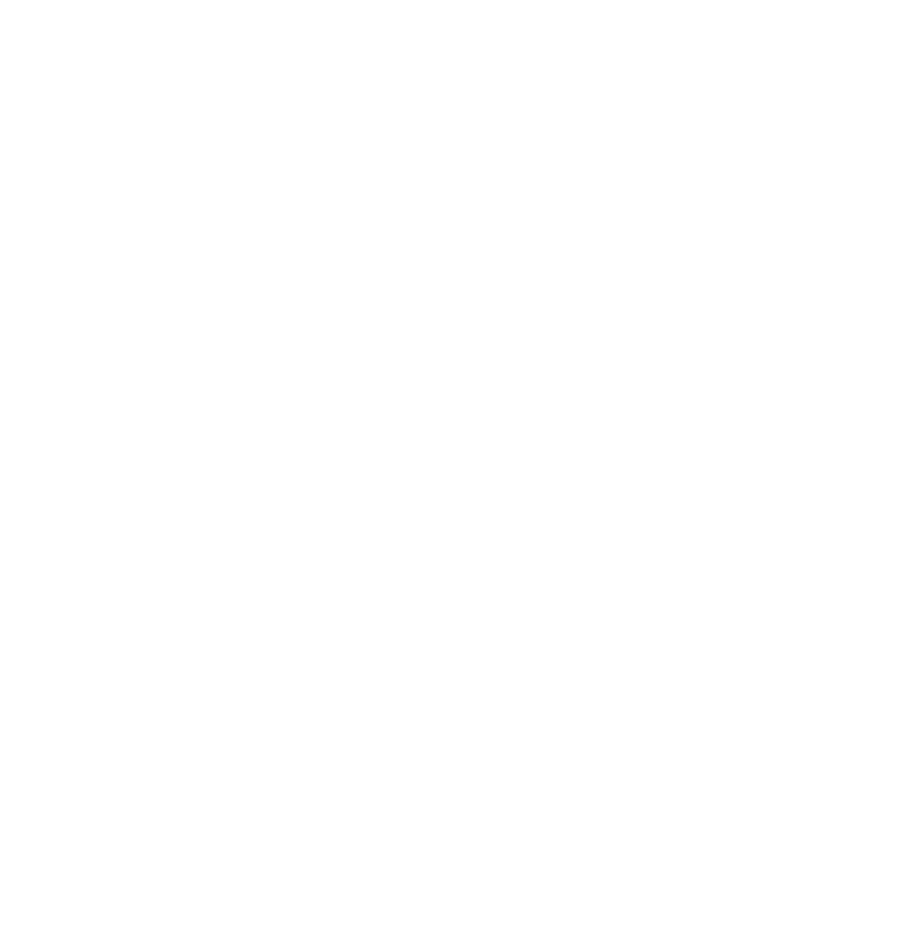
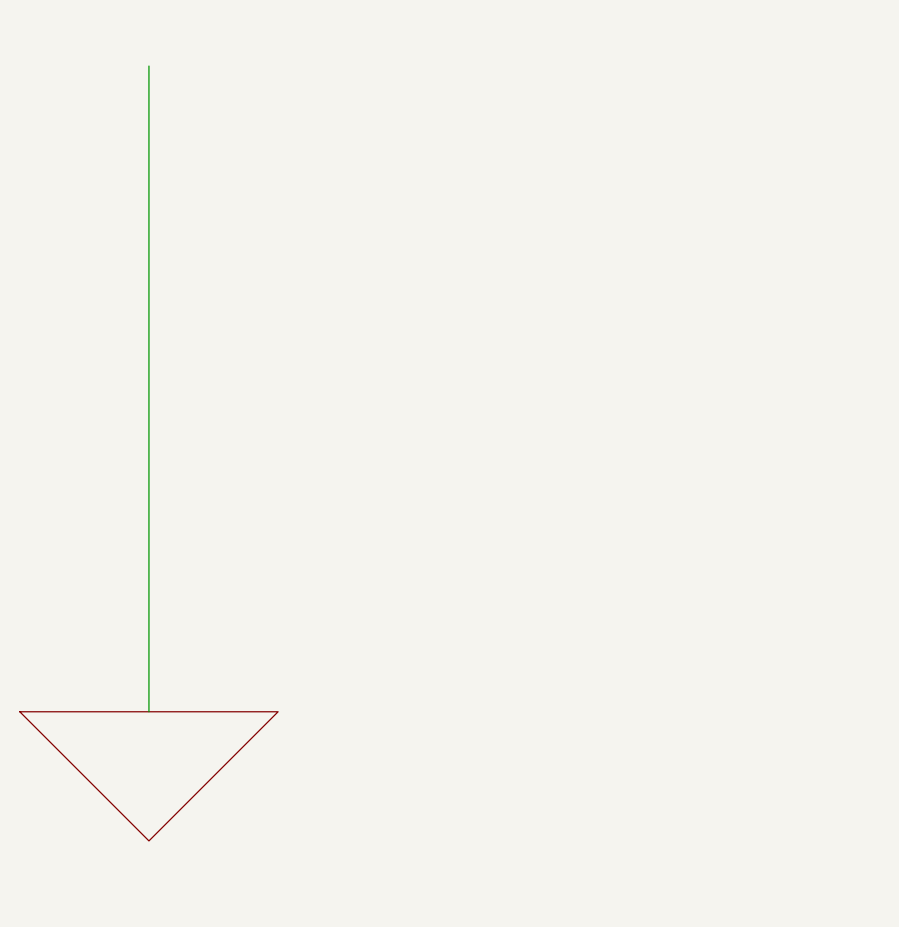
wire: none -> (148, 66) (148, 711)
power symbol: none -> (148, 776)

